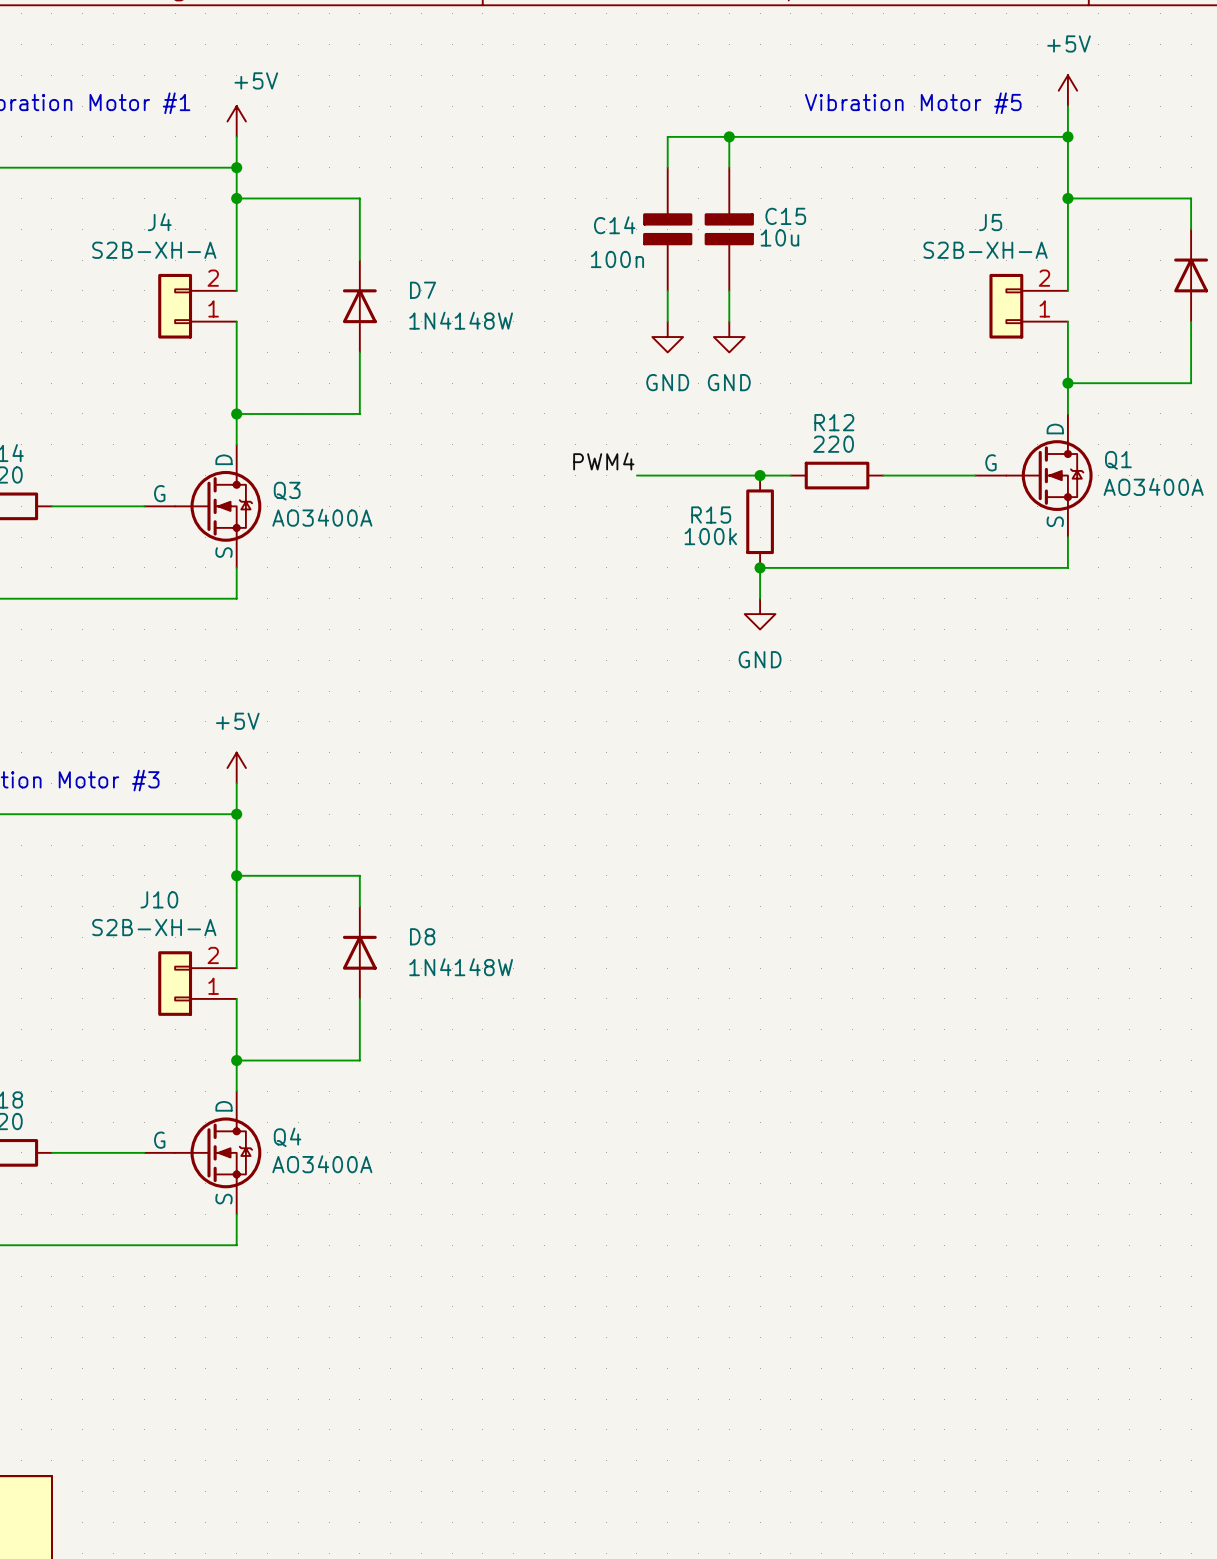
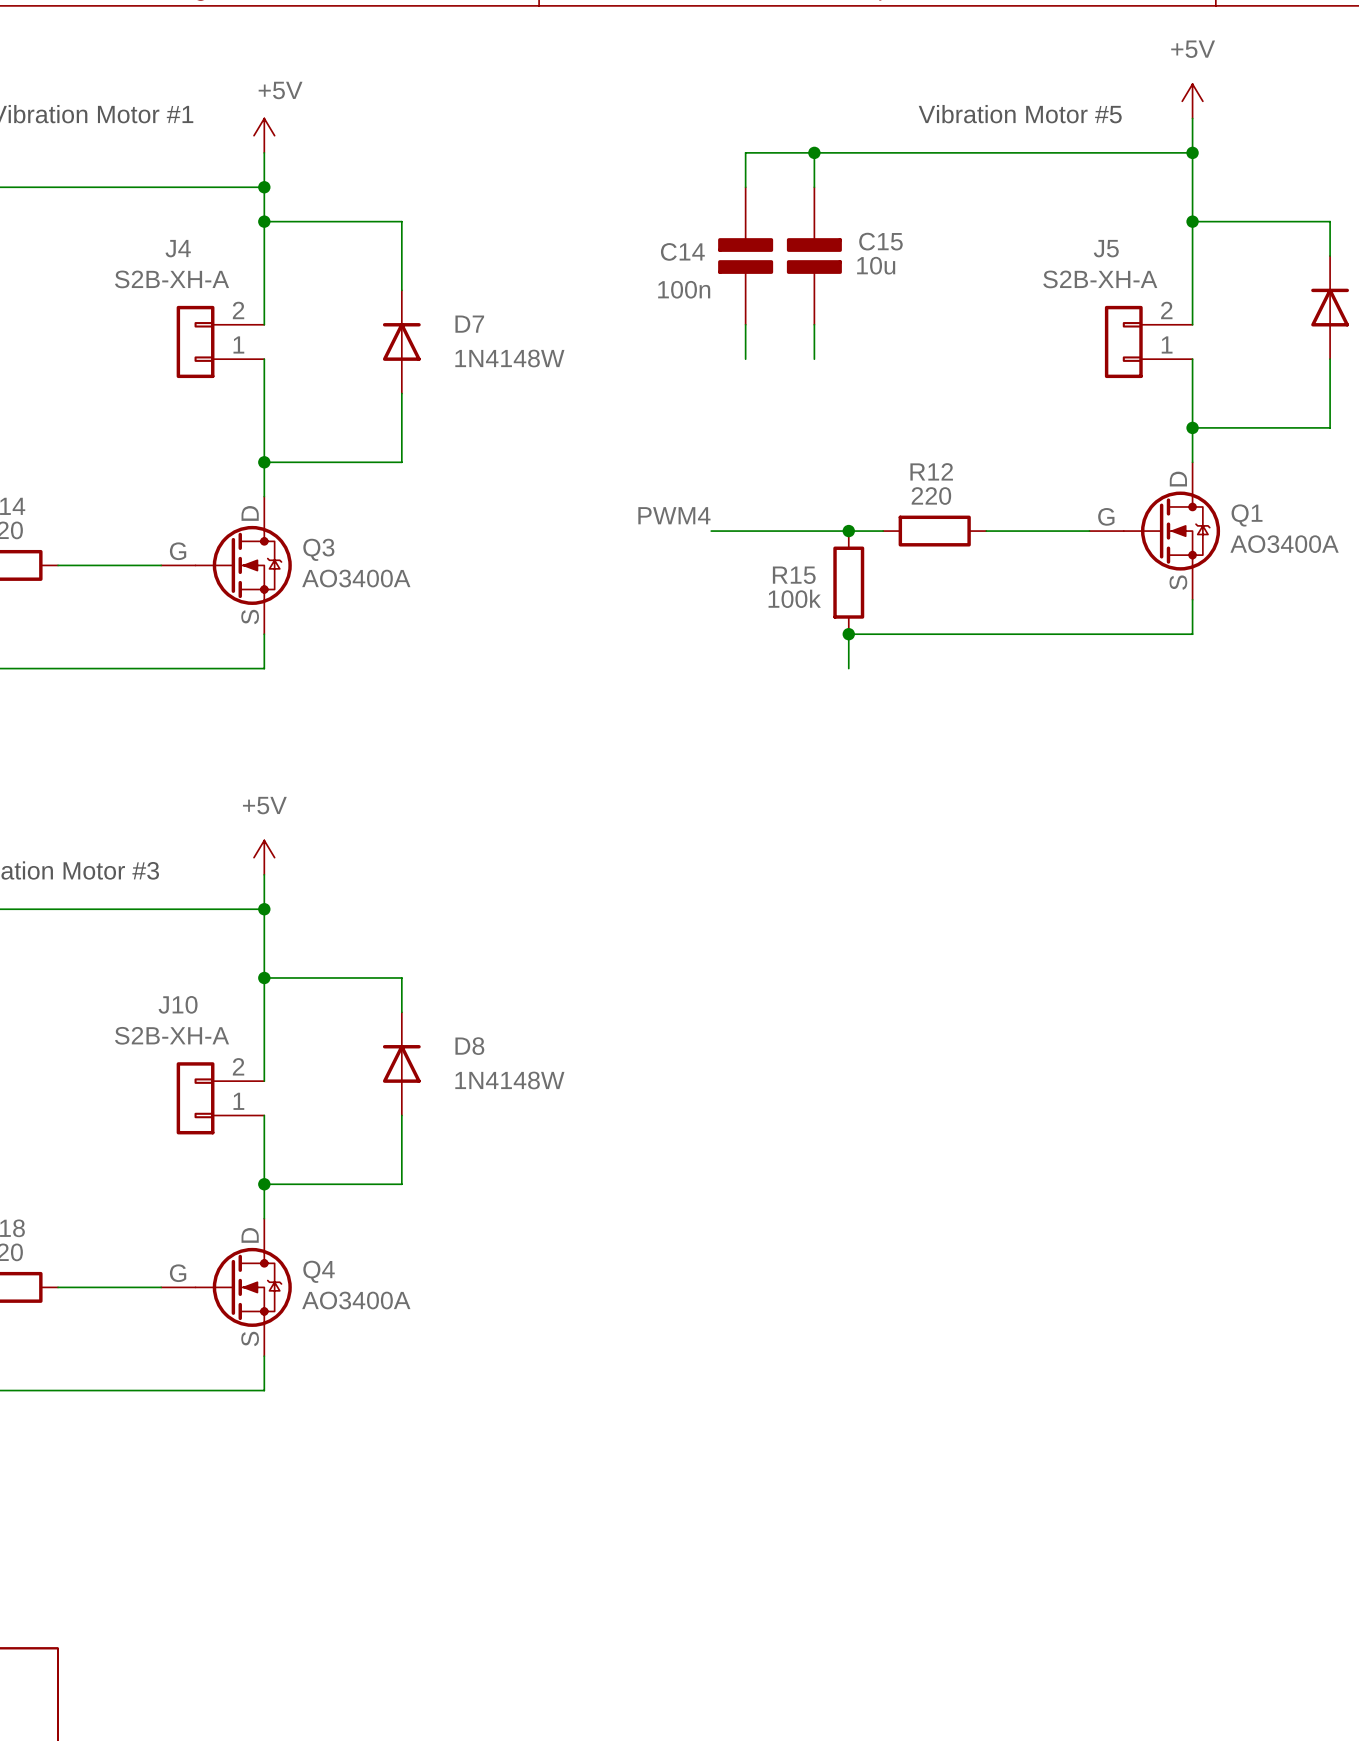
power symbol: GND (667, 337) -> none
power symbol: GND (729, 337) -> none
power symbol: GND (760, 614) -> none

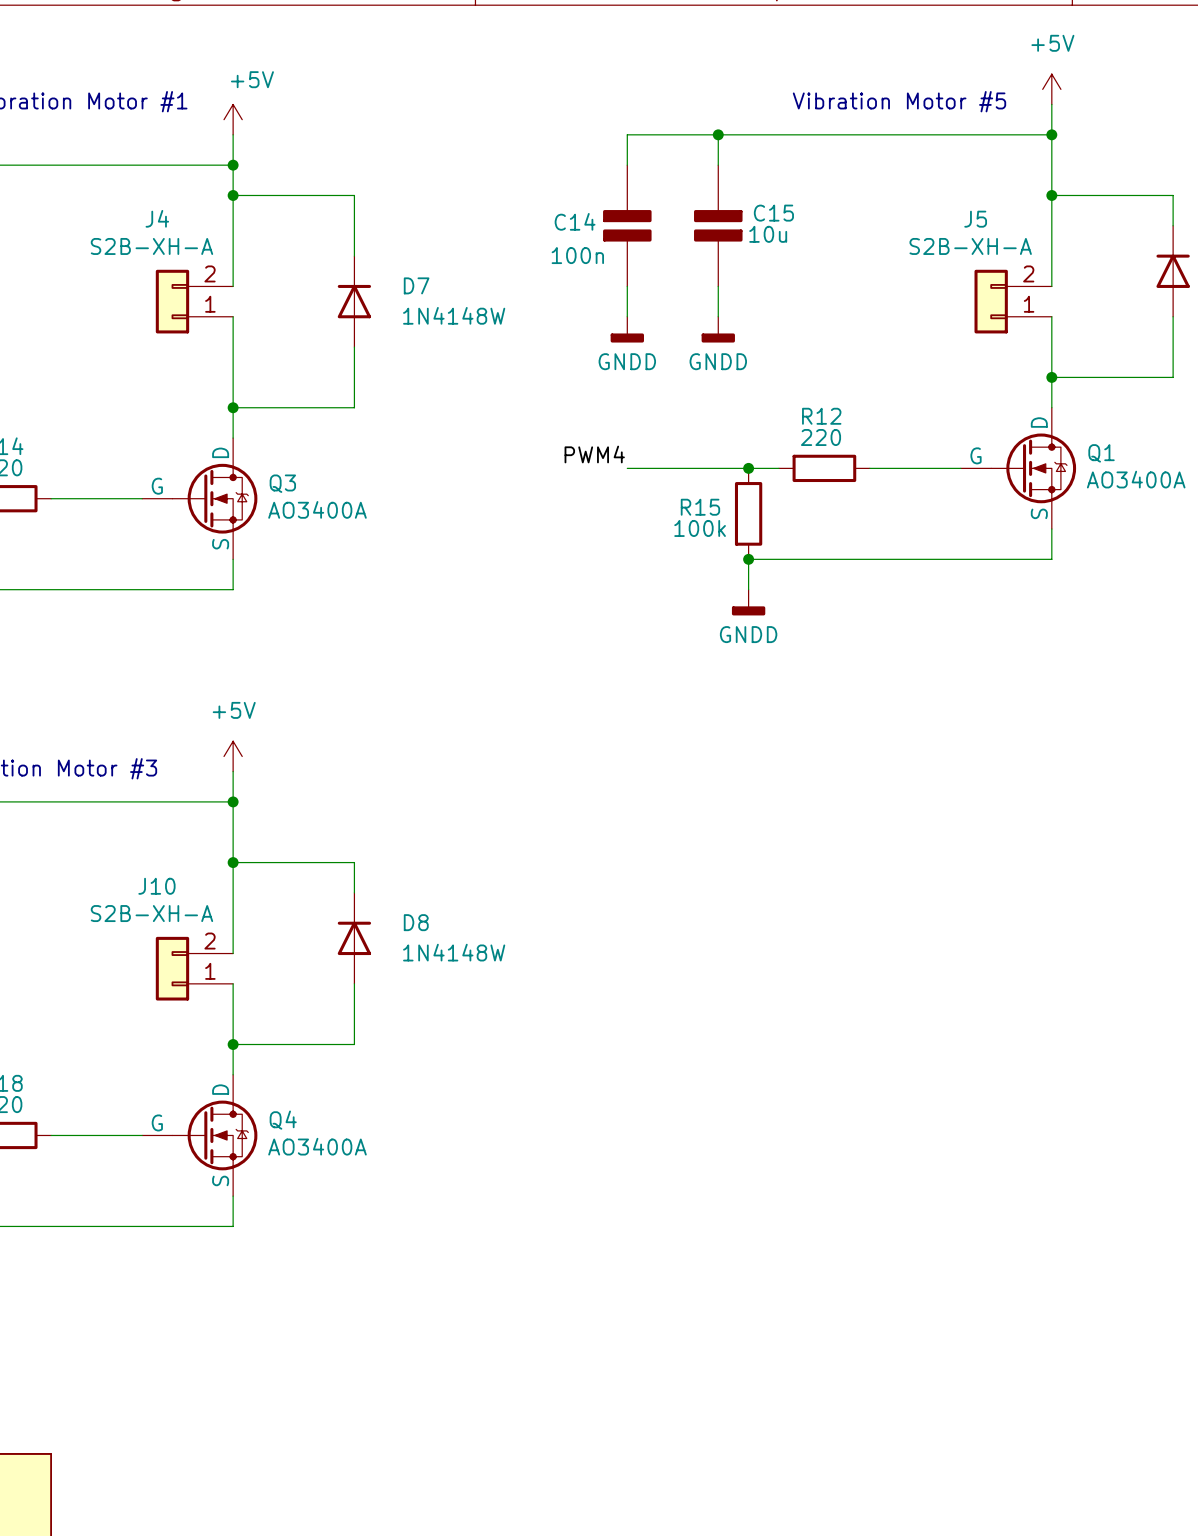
wire: (745, 152) (745, 187) -> (657, 134) (627, 134) (627, 165)
C14 position: (745, 256) -> (627, 225)
wire: (745, 324) (745, 359) -> (627, 286) (627, 316)
power symbol: none -> GNDD (627, 329)
power symbol: none -> GNDD (718, 329)
power symbol: none -> GNDD (748, 602)

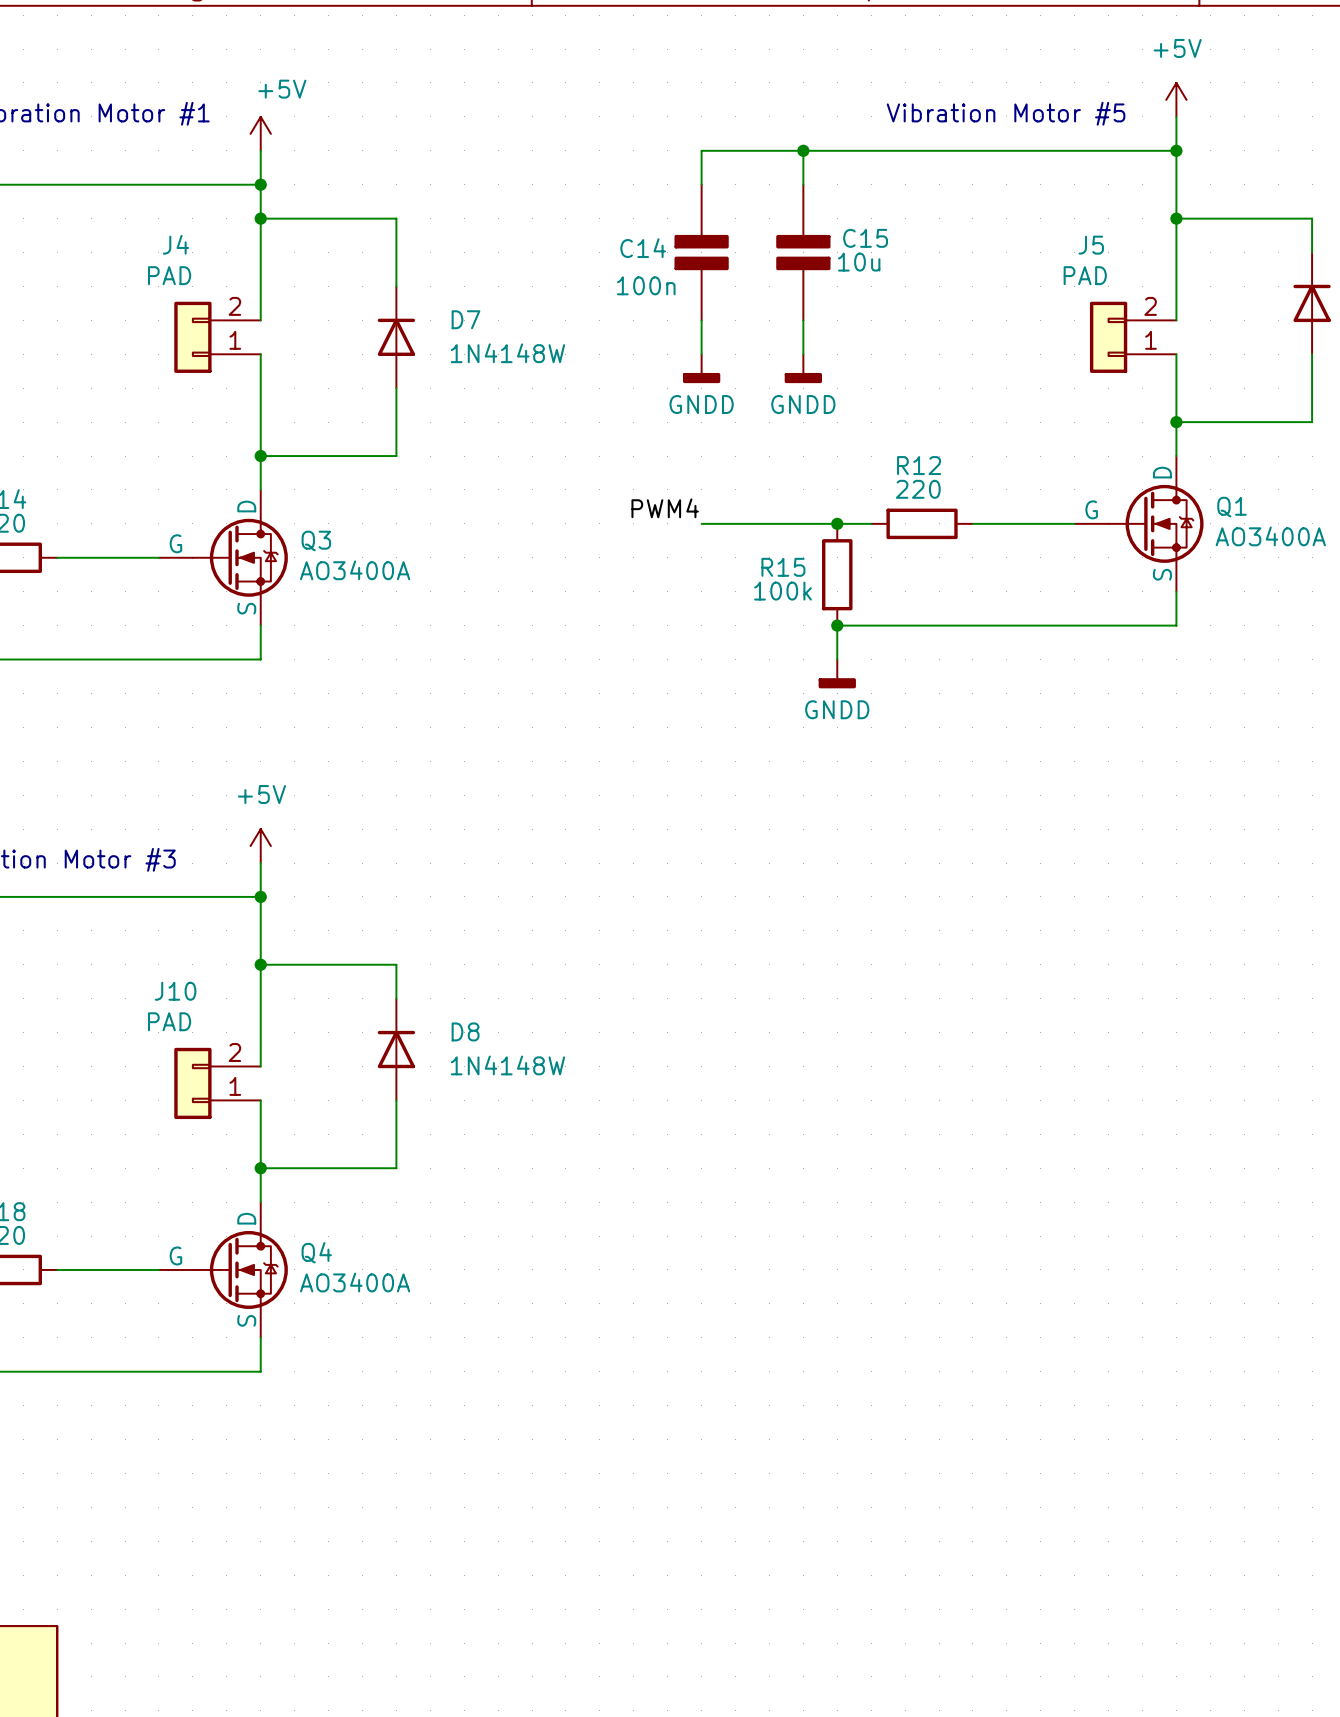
J4 value: S2B-XH-A (151, 246) -> PAD (169, 275)
J5 value: S2B-XH-A (970, 246) -> PAD (1085, 275)
J10 value: S2B-XH-A (151, 913) -> PAD (169, 1021)

